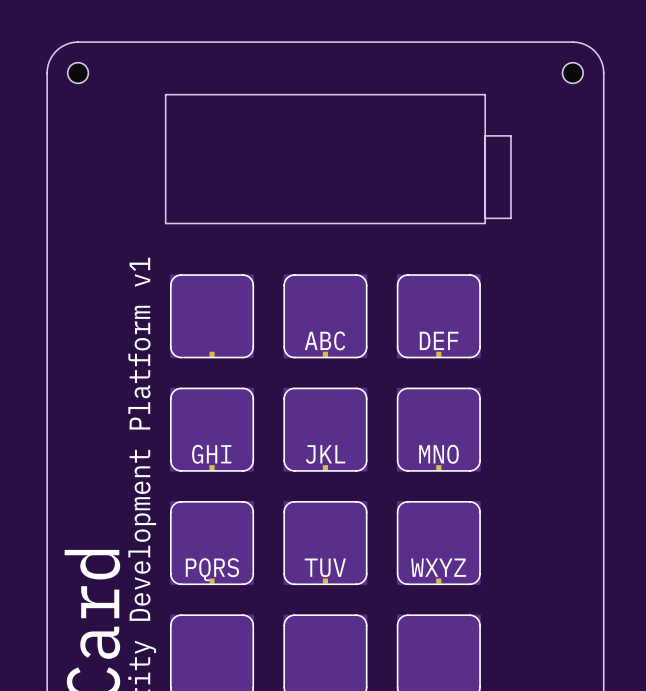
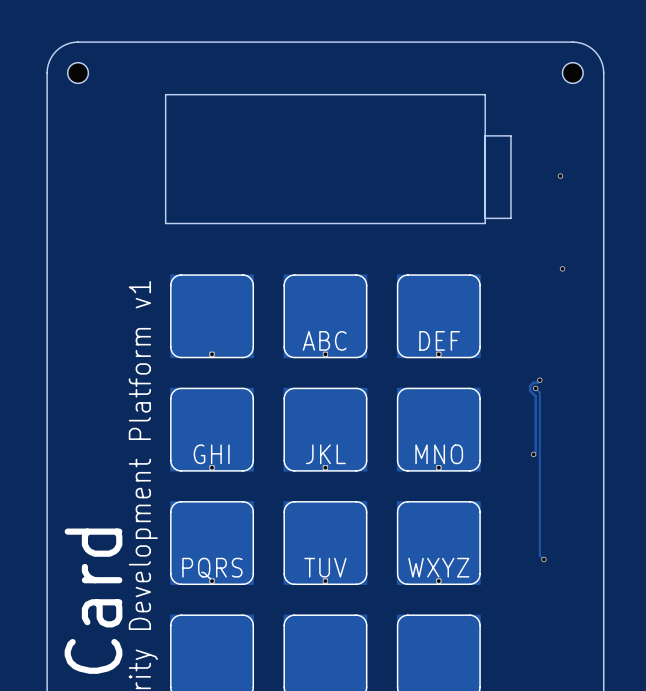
via: none -> (560, 176)
via: none -> (562, 268)
via: none -> (212, 354)
via: none -> (325, 354)
via: none -> (438, 354)
track: none -> (539, 380) (530, 386) (530, 390) (535, 396) (535, 452) (533, 454)
via: none -> (539, 380)
track: none -> (535, 388) (539, 392) (539, 555) (543, 559)
via: none -> (535, 388)
via: none -> (533, 454)
via: none -> (212, 467)
via: none -> (325, 467)
via: none -> (438, 467)
via: none -> (543, 559)
via: none -> (212, 581)
via: none -> (325, 581)
via: none -> (438, 581)

